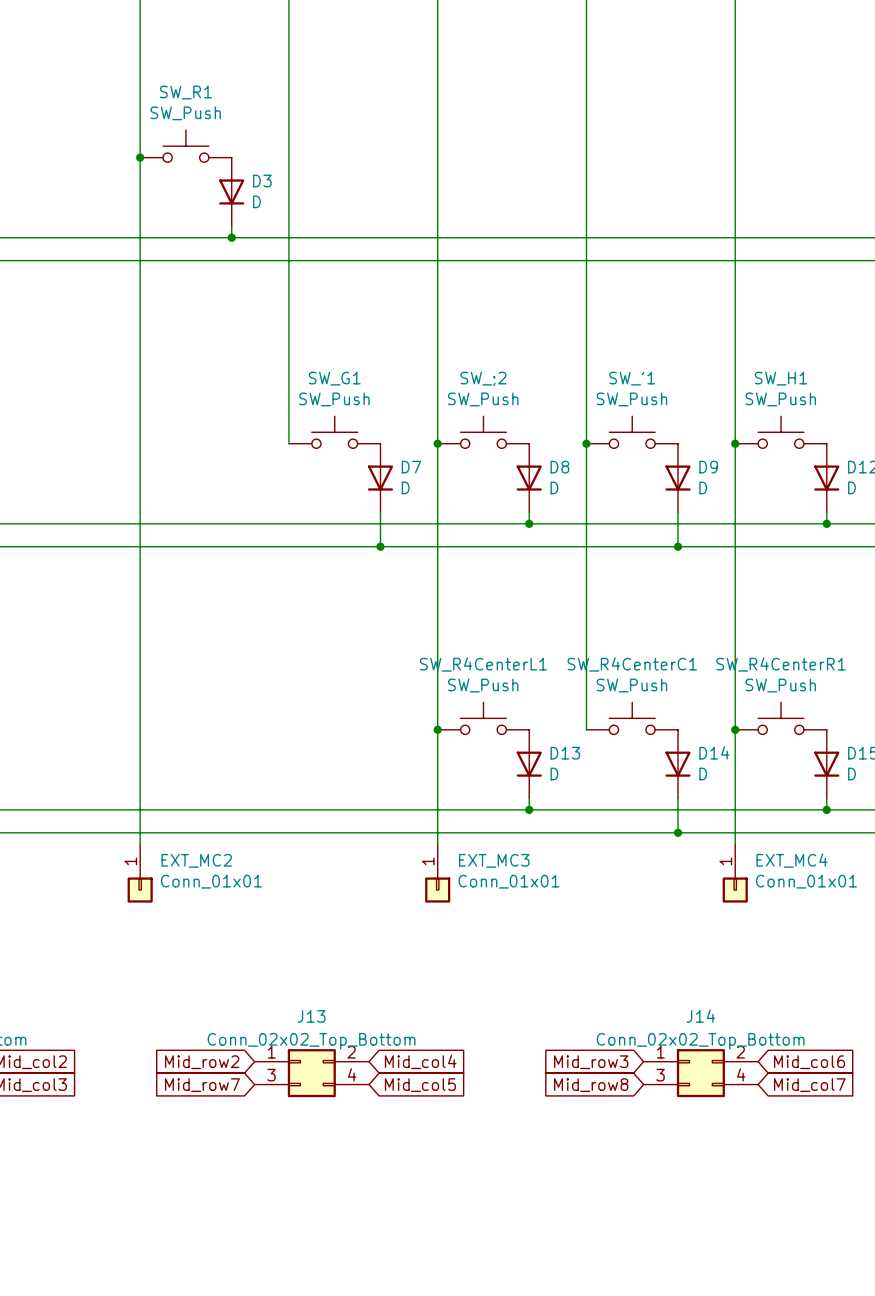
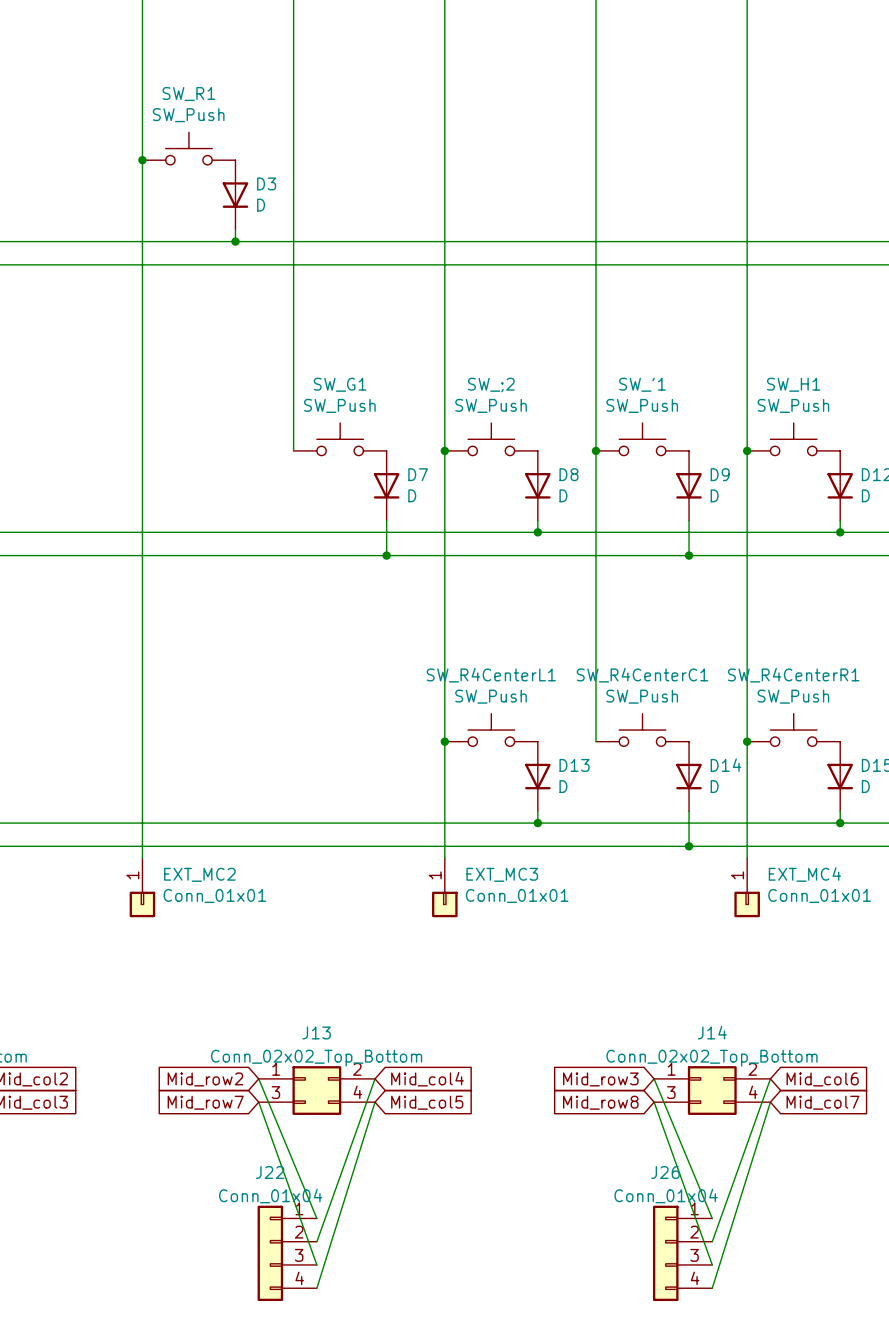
wire: none -> (258, 1078) (316, 1218)
wire: none -> (375, 1078) (316, 1241)
wire: none -> (654, 1078) (712, 1218)
wire: none -> (770, 1078) (712, 1241)
wire: none -> (258, 1102) (316, 1264)
wire: none -> (375, 1102) (316, 1288)
wire: none -> (654, 1102) (712, 1264)
wire: none -> (770, 1102) (712, 1288)
J22: none -> Conn_01x04 (287, 1253)
J26: none -> Conn_01x04 (682, 1253)

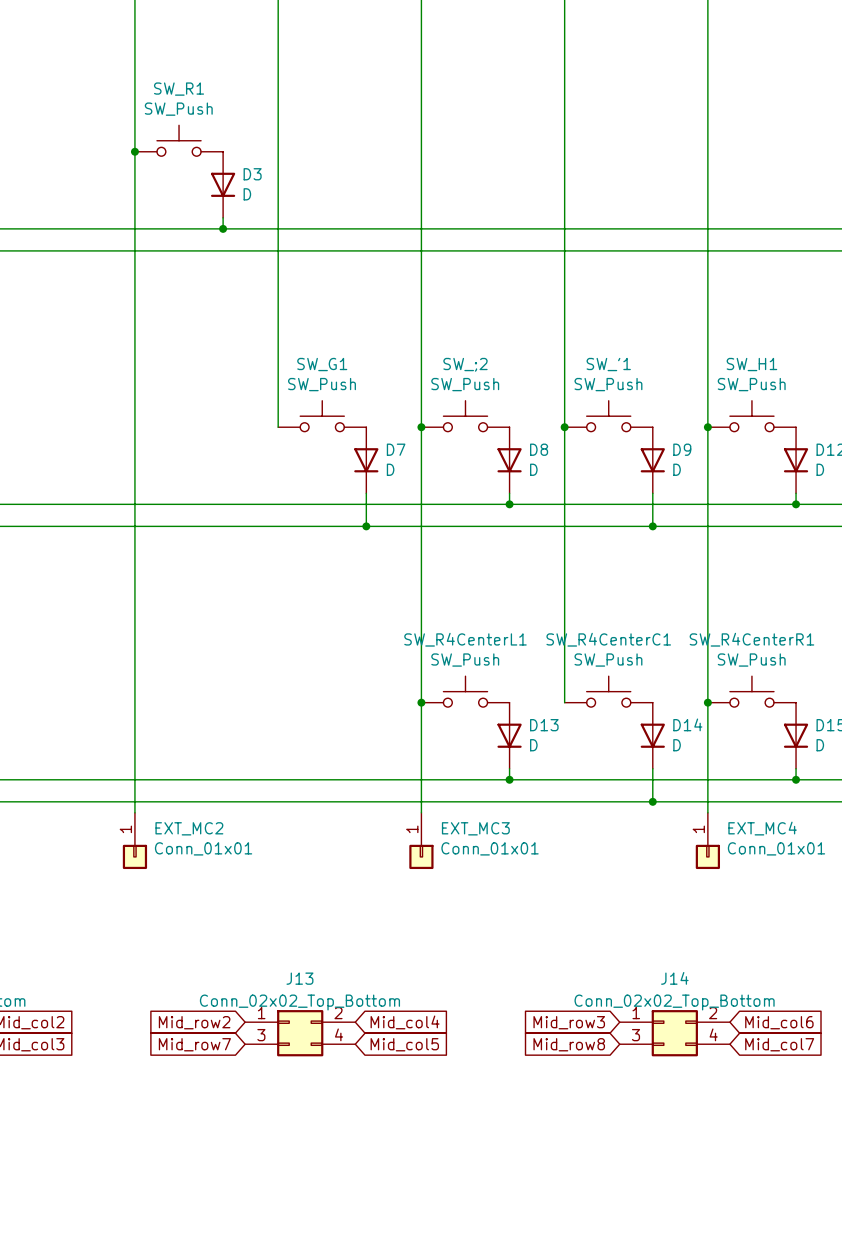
wire: (258, 1078) (316, 1218) -> none
wire: (375, 1078) (316, 1241) -> none
wire: (654, 1078) (712, 1218) -> none
wire: (770, 1078) (712, 1241) -> none
wire: (258, 1102) (316, 1264) -> none
wire: (375, 1102) (316, 1288) -> none
wire: (654, 1102) (712, 1264) -> none
wire: (770, 1102) (712, 1288) -> none
J22: Conn_01x04 (287, 1253) -> none
J26: Conn_01x04 (682, 1253) -> none

